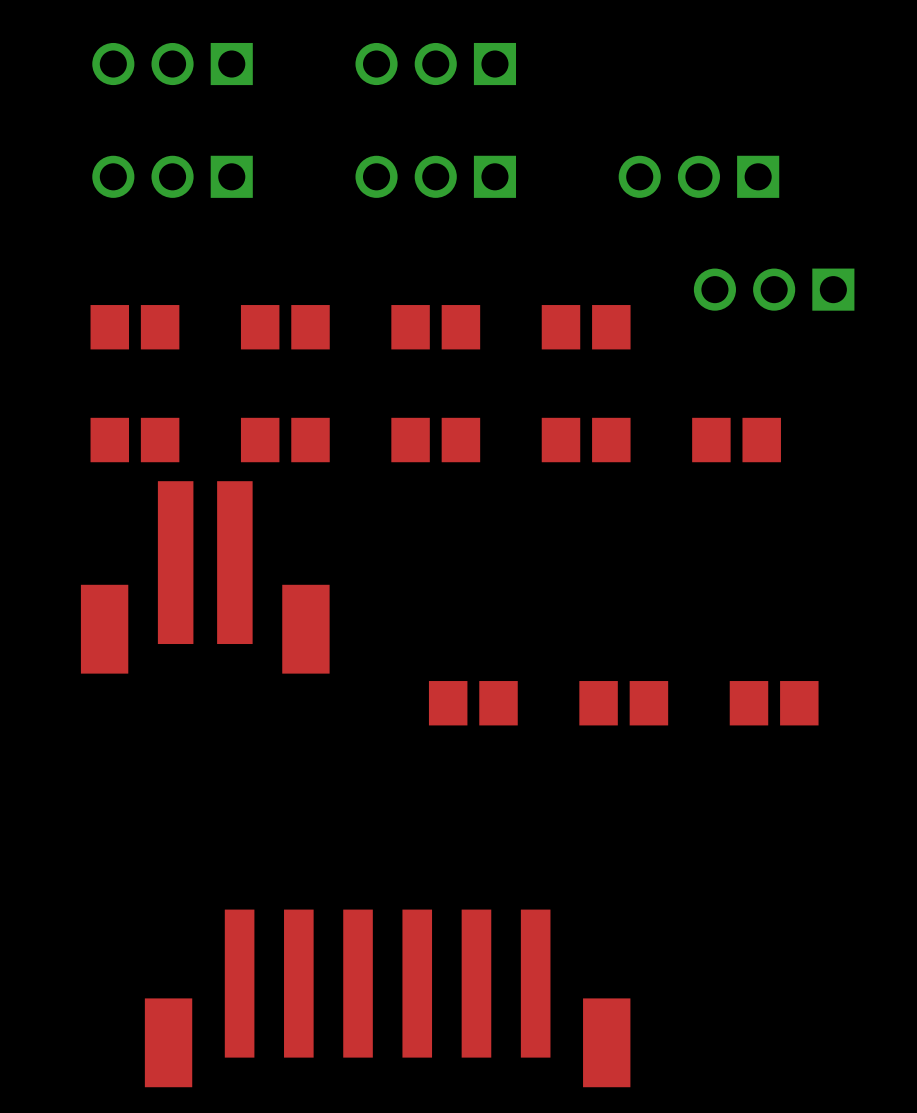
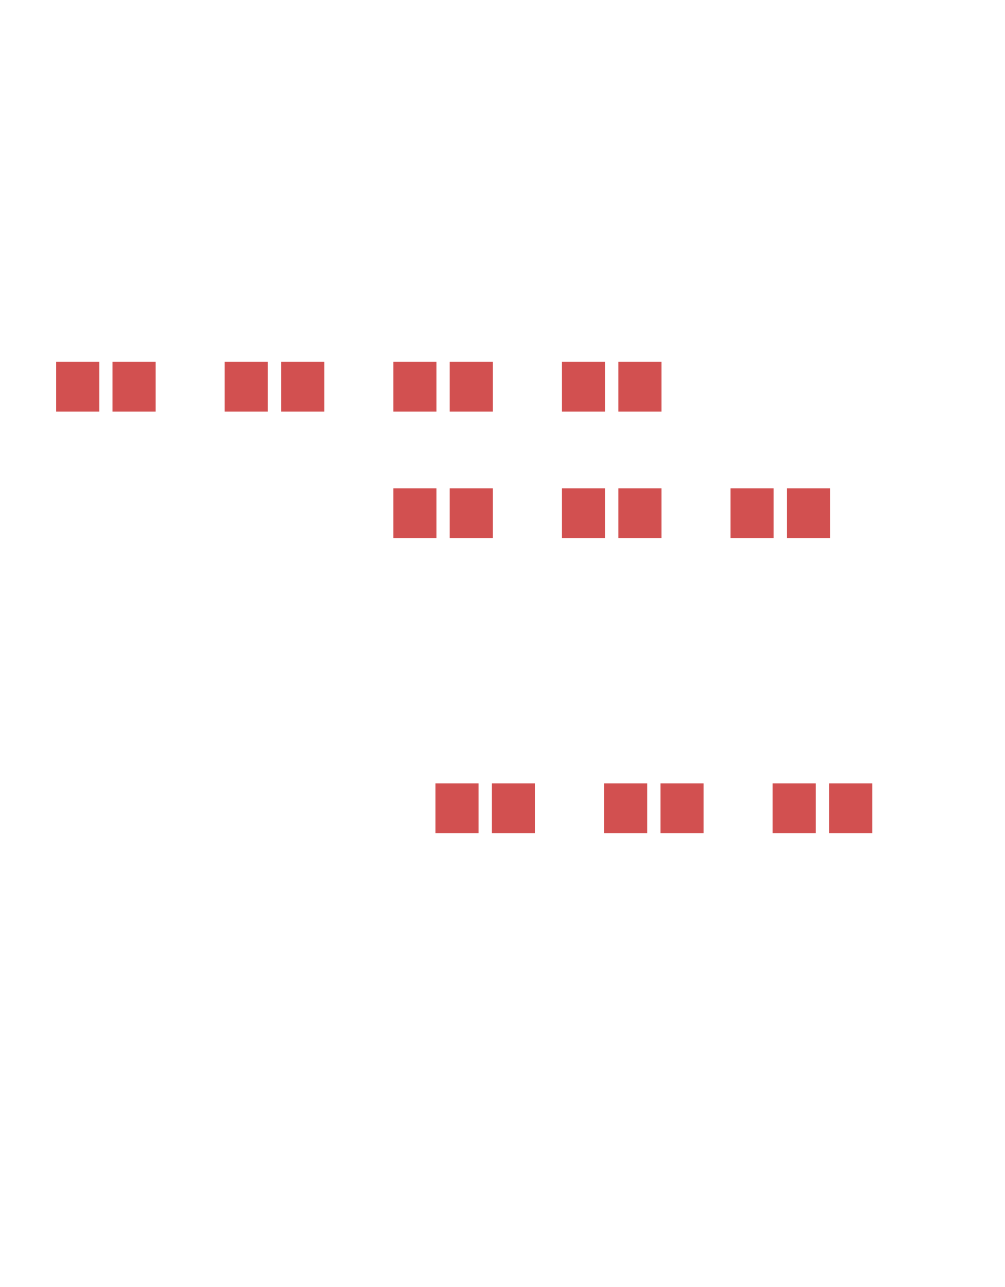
part: (172, 64) -> none
part: (435, 64) -> none
part: (172, 176) -> none
part: (435, 176) -> none
part: (698, 176) -> none
part: (774, 289) -> none
part: (134, 440) -> none
part: (285, 440) -> none
part: (205, 577) -> none
part: (387, 998) -> none

